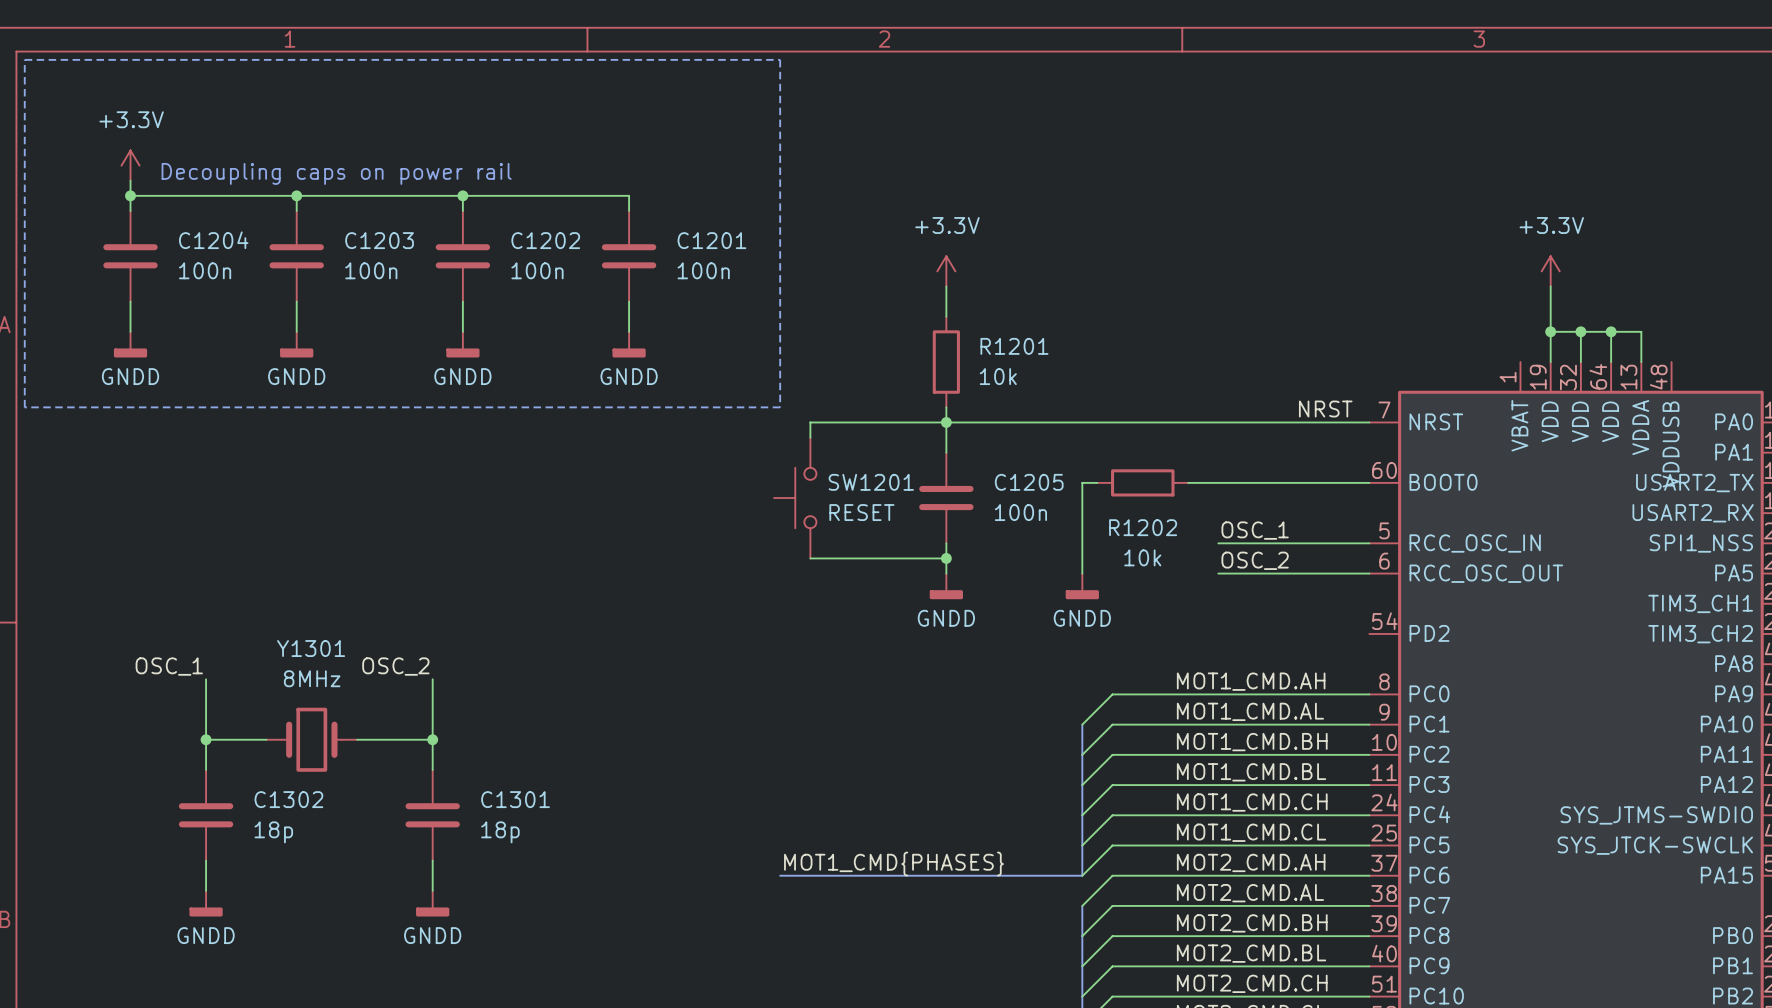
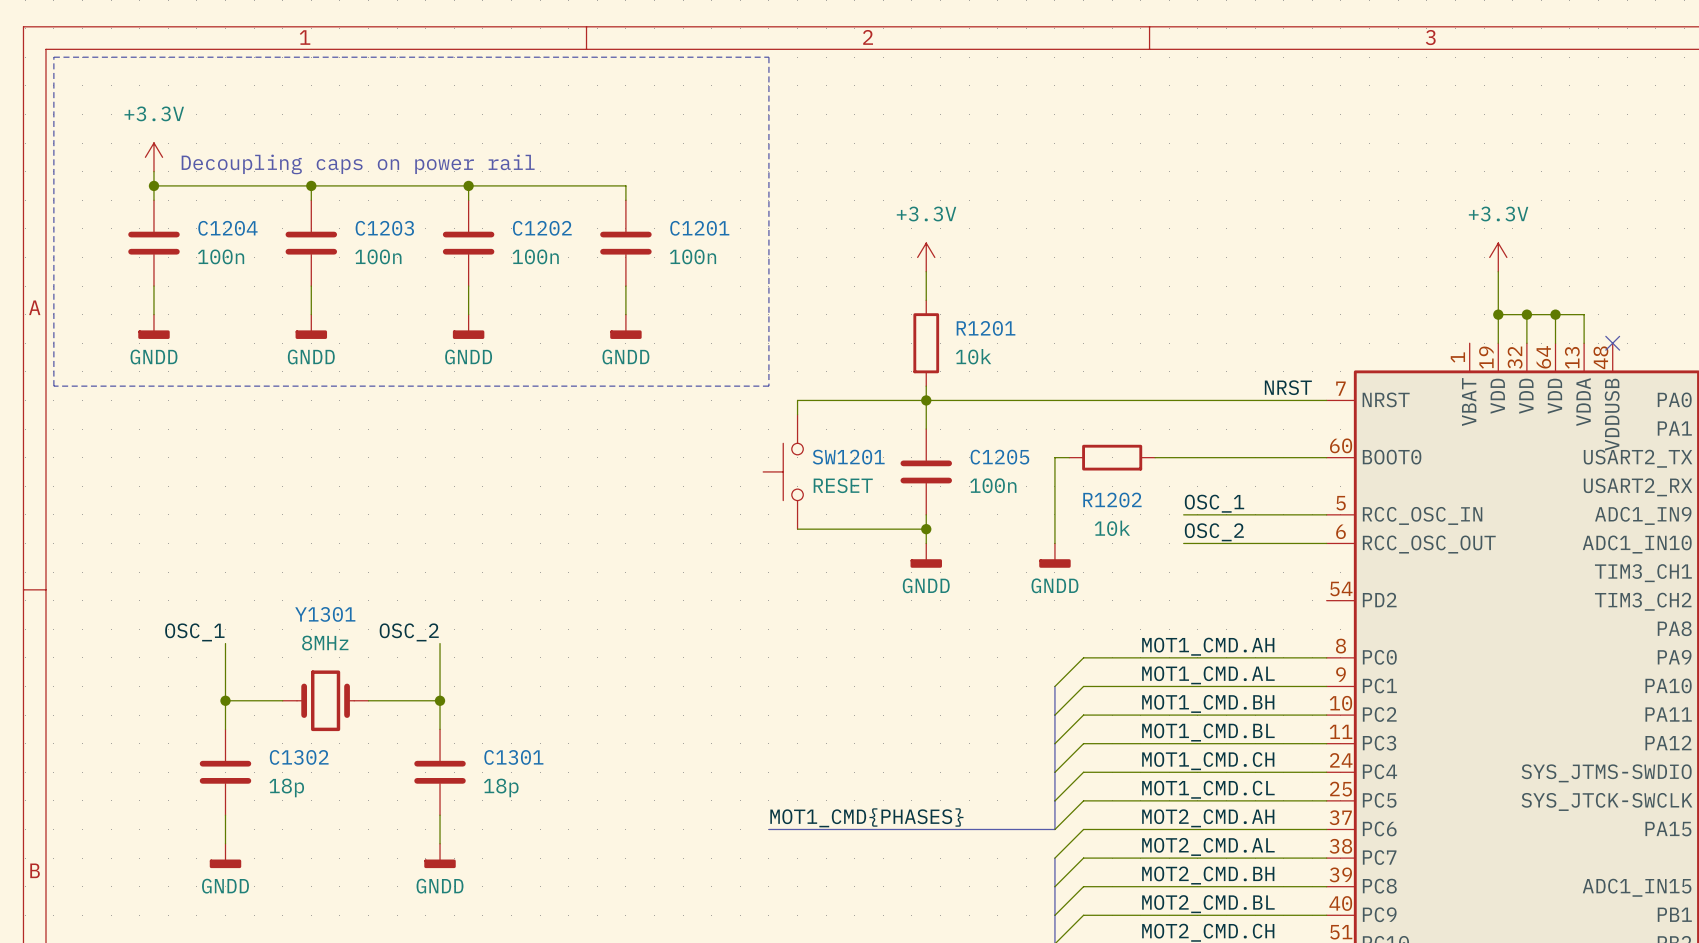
no-connect mark: none -> (1612, 343)
part pin name: SPI1_NSS (1701, 543) -> ADC1_IN9 (1643, 515)
part pin name: PA5 (1734, 572) -> ADC1_IN10 (1637, 544)
part pin name: PB0 (1733, 935) -> ADC1_IN15 (1637, 887)

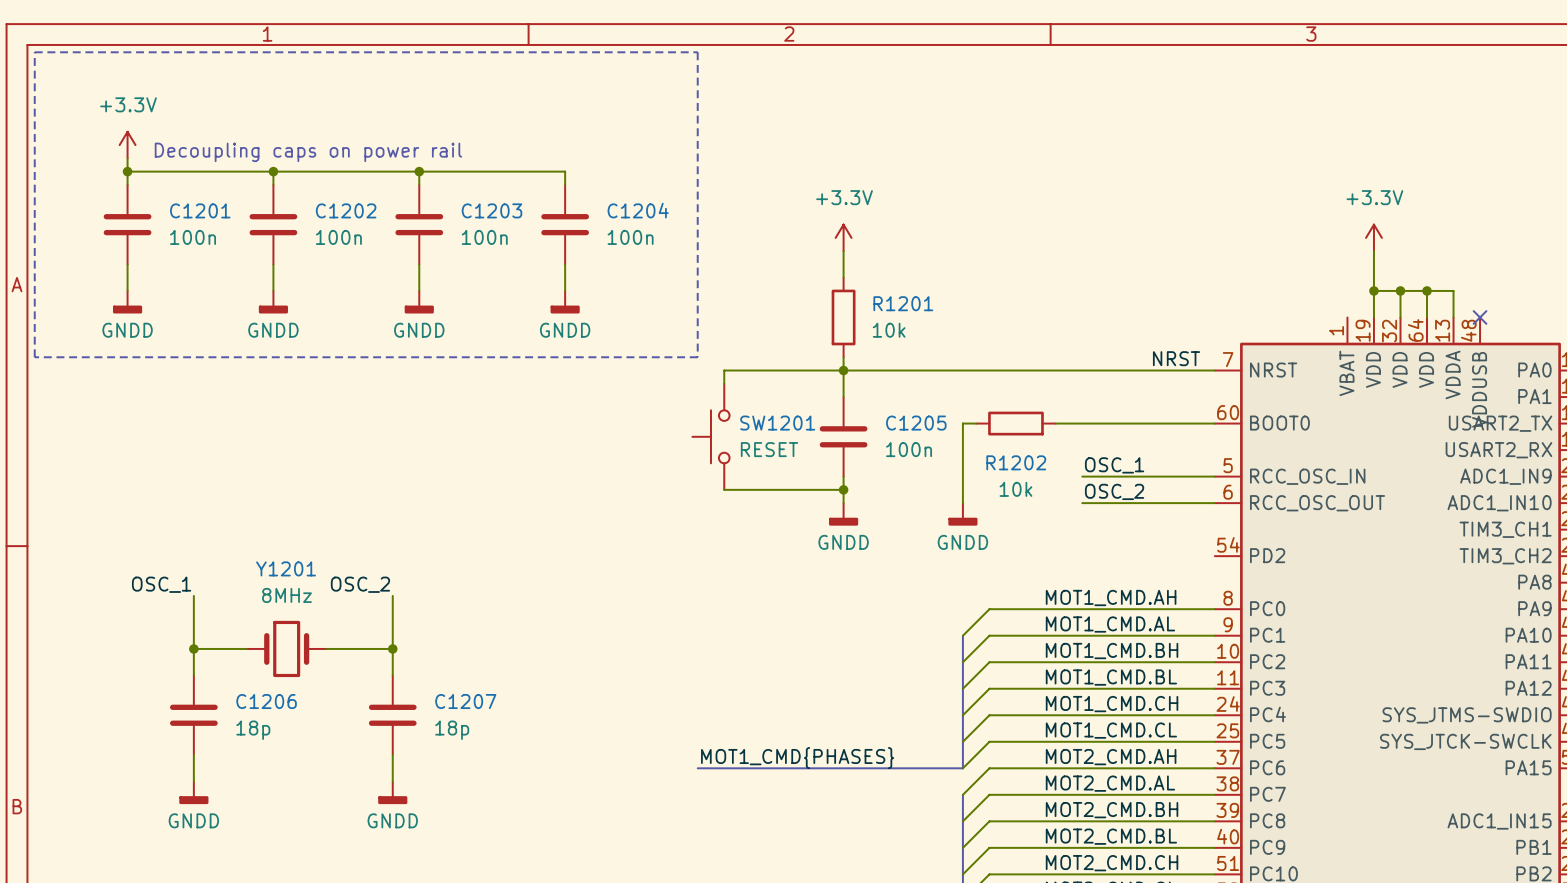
C1204 name: C1204 (227, 228) -> C1201 (200, 210)
C1203 name: C1203 (384, 228) -> C1202 (346, 210)
C1202 name: C1202 (542, 228) -> C1203 (491, 210)
C1201 name: C1201 (699, 228) -> C1204 (638, 210)
Y1301 name: Y1301 (325, 614) -> Y1201 (286, 568)
C1302 name: C1302 (299, 757) -> C1206 (266, 701)
C1301 name: C1301 (513, 757) -> C1207 (465, 701)

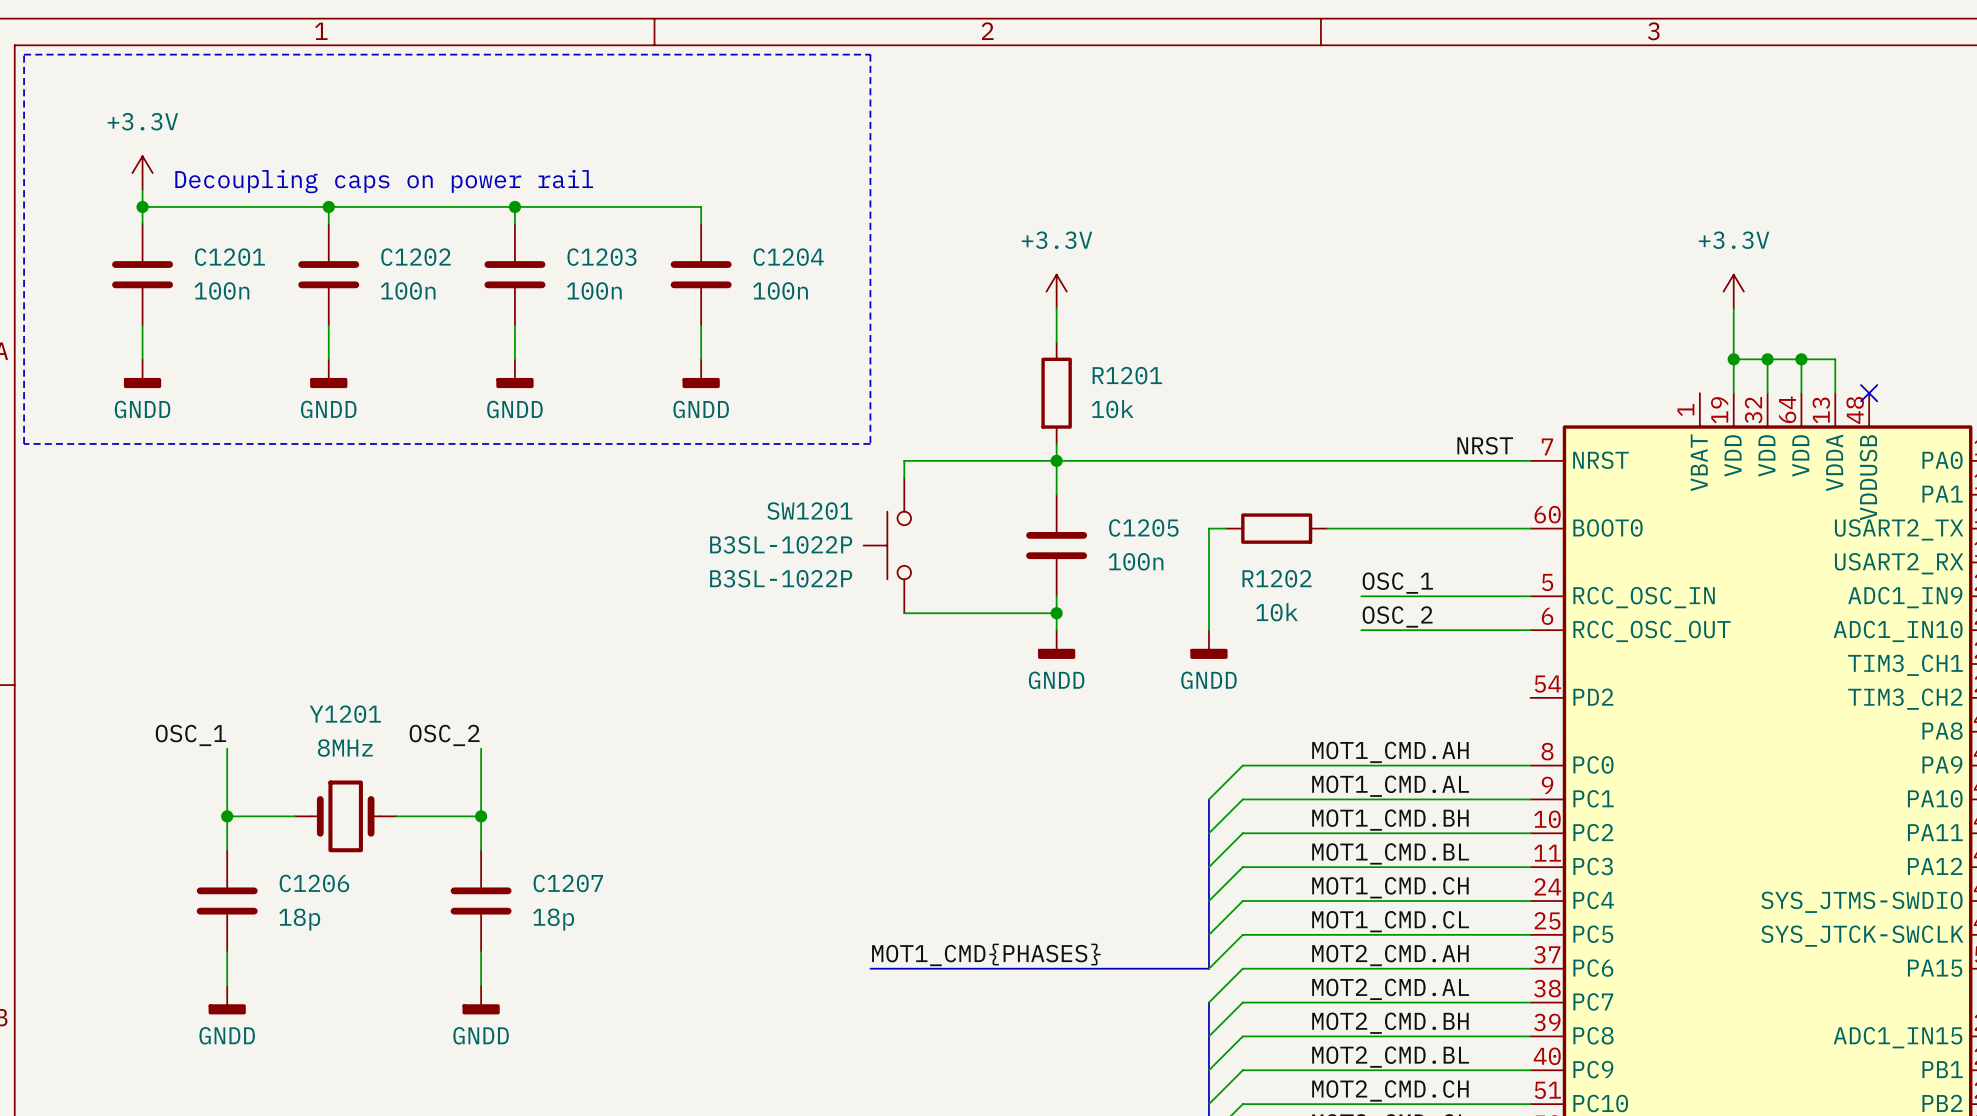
SW1201 name position: SW1201 (777, 423) -> SW1201 (809, 511)
SW1201 value: RESET (769, 449) -> B3SL-1022P (781, 544)
SW1201 text: none -> B3SL-1022P (781, 578)

